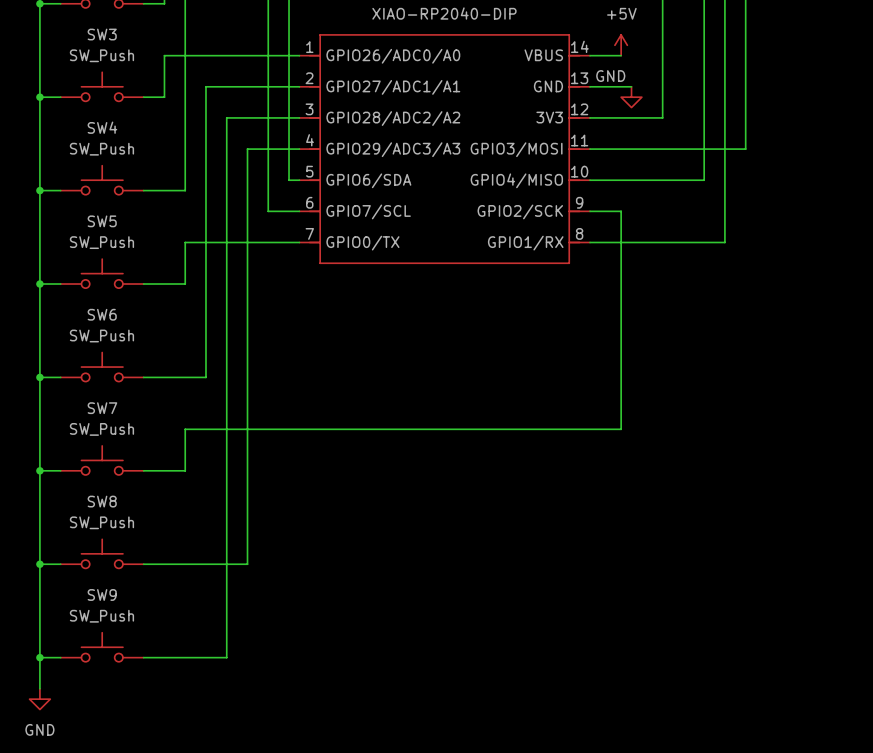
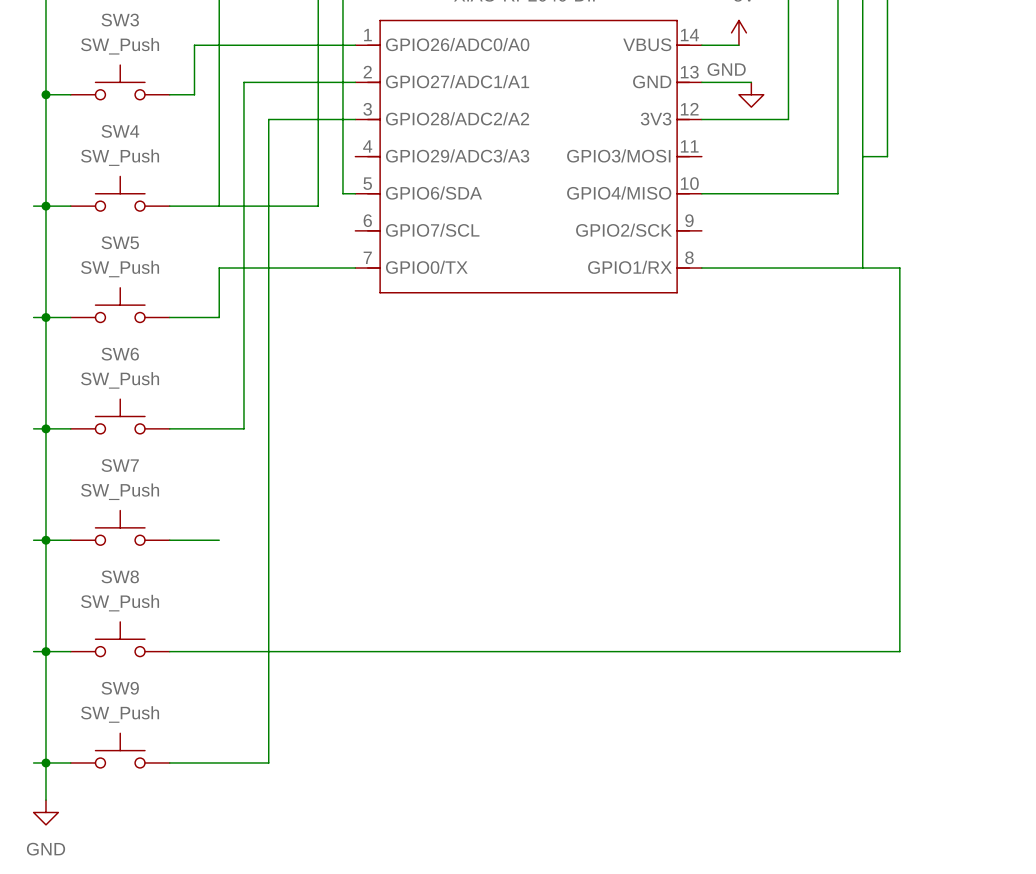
wire: (299, 149) (247, 149) (247, 564) -> (862, 268) (899, 268) (899, 651) (293, 651)
wire: (590, 149) (724, 149) -> none
wire: none -> (33, 206) (45, 206)
wire: (268, 190) (268, 211) (299, 211) -> (318, 206) (219, 206)
wire: (590, 211) (621, 211) (621, 429) (185, 429) (185, 470) -> none
wire: none -> (33, 317) (45, 317)
wire: none -> (33, 428) (45, 428)
wire: none -> (33, 540) (45, 540)
wire: none -> (33, 651) (45, 651)
wire: none -> (33, 762) (45, 762)

